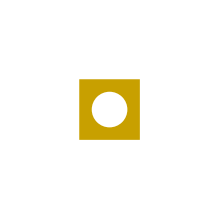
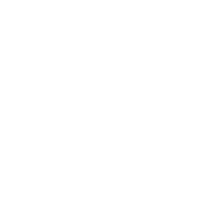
part: (109, 109) -> none

